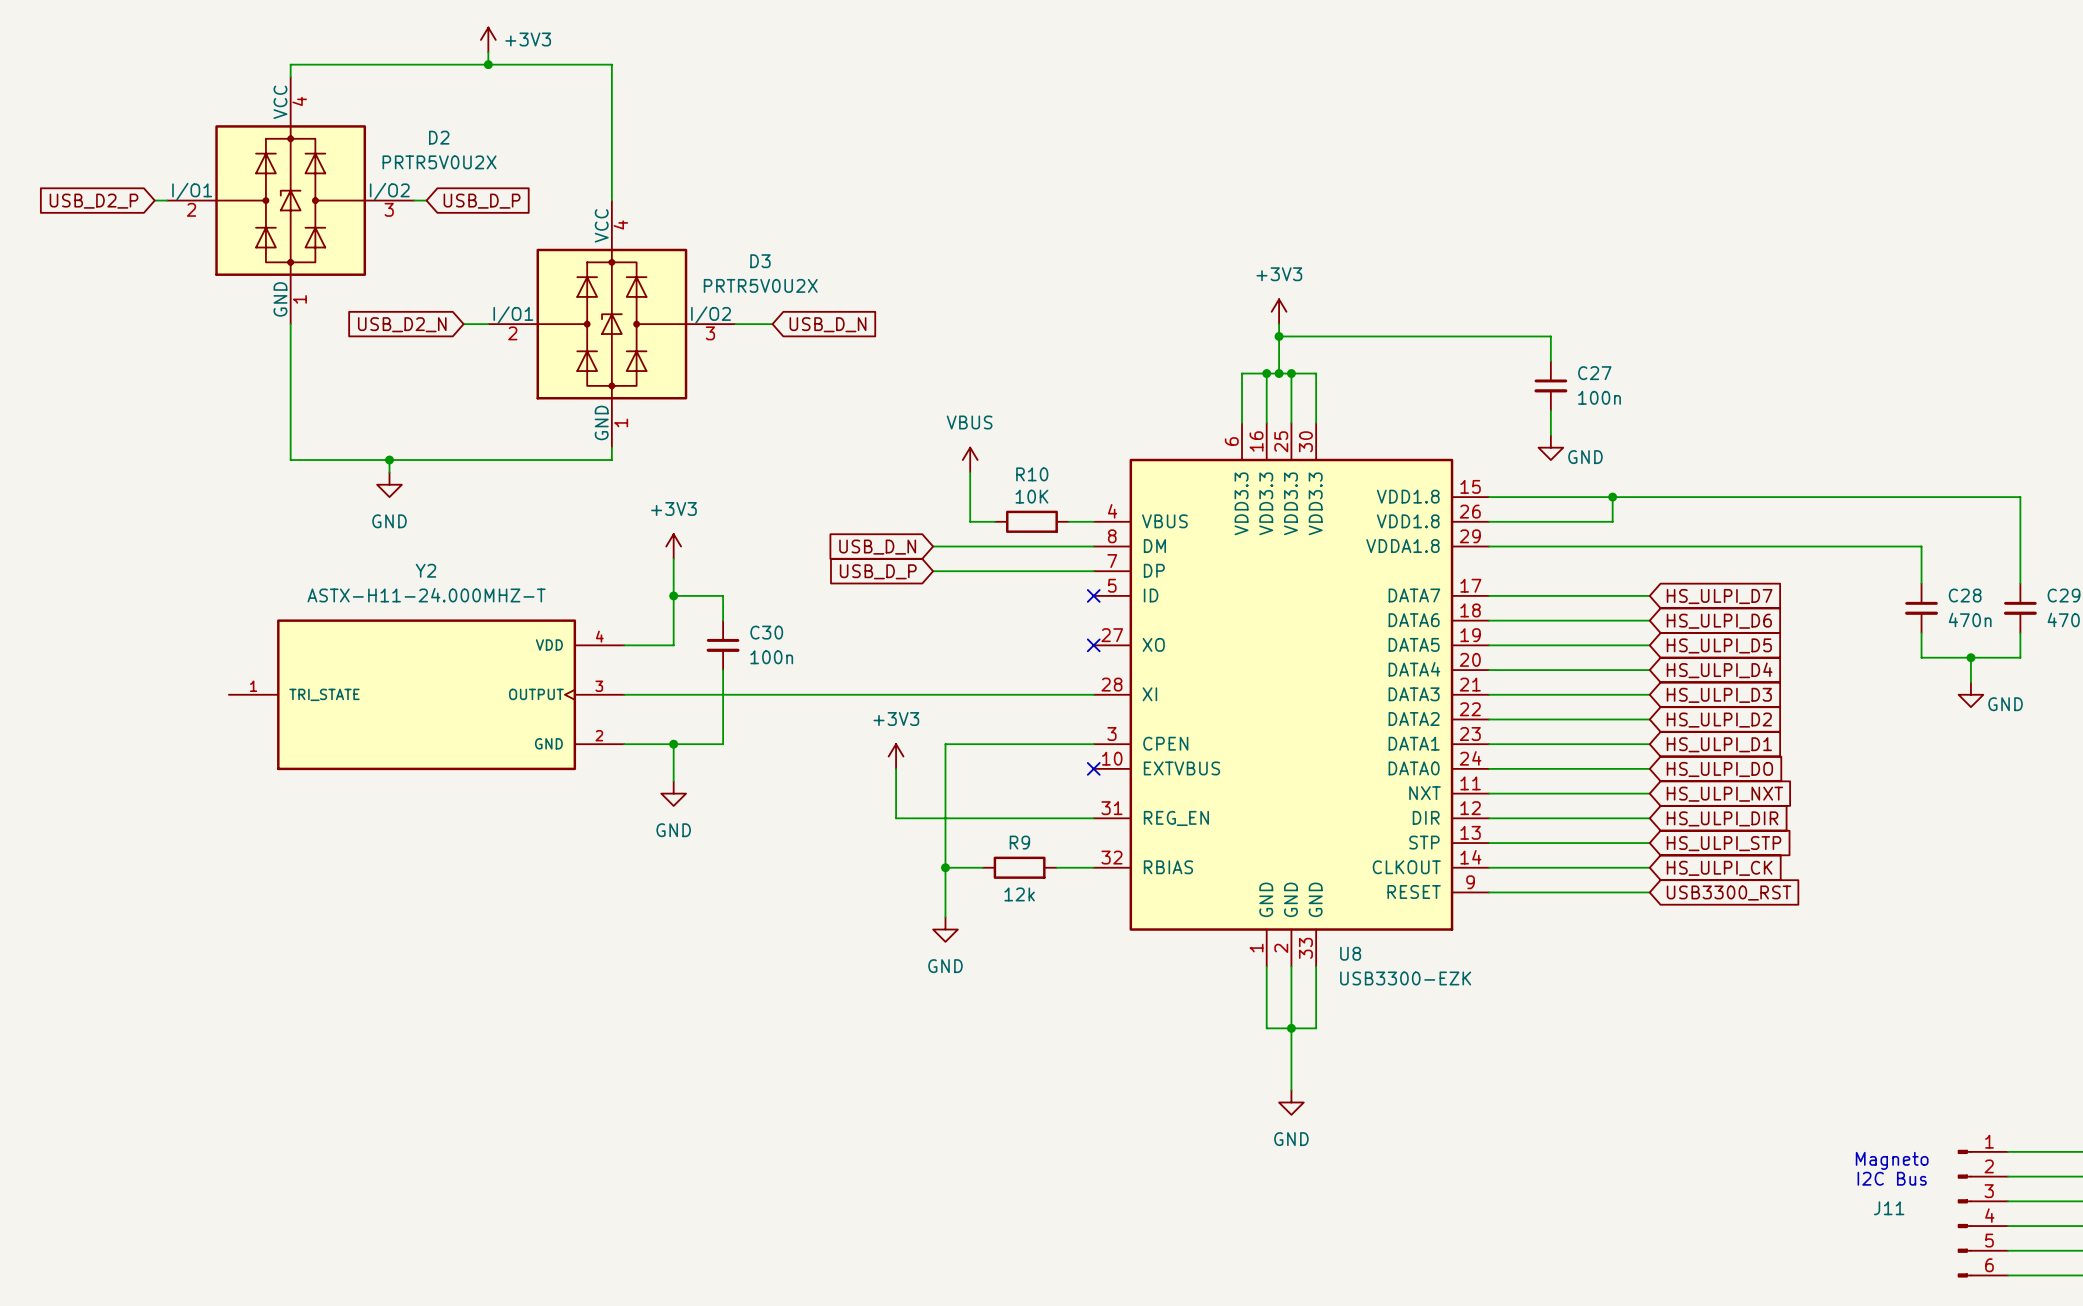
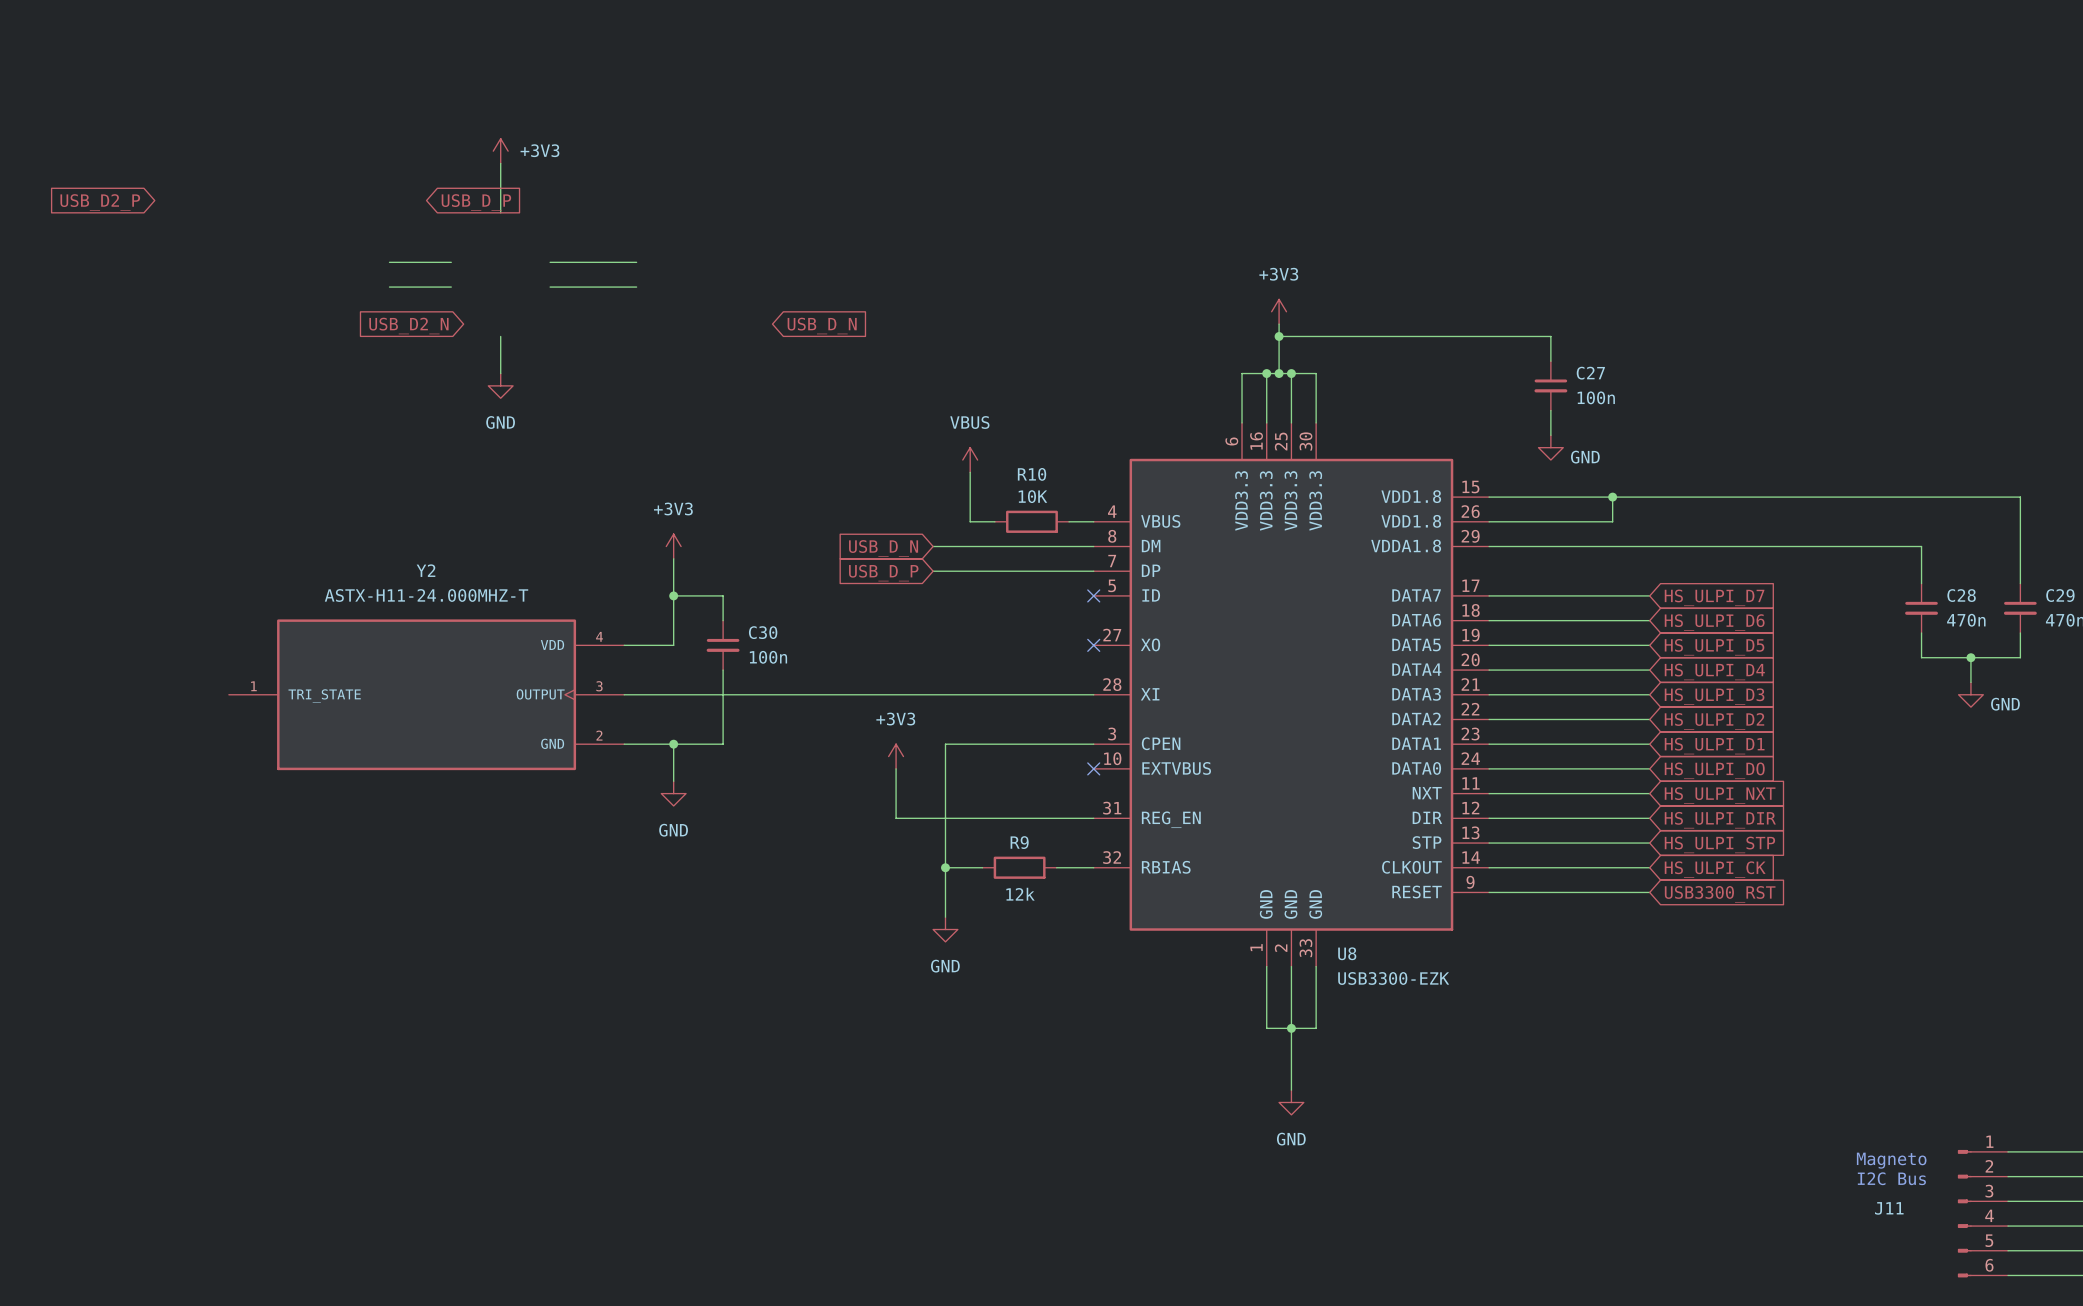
power symbol position: +3V3 (488, 39) -> +3V3 (500, 151)
wire: (488, 52) (488, 64) -> none
junction: (488, 64) -> none
wire: (290, 77) (290, 64) (611, 64) (611, 200) -> none
wire: none -> (500, 163) (500, 212)
wire: (154, 200) (167, 200) -> none
D2: PRTR5V0U2X (290, 200) -> none
wire: (414, 200) (426, 200) -> none
wire: none -> (389, 262) (451, 262)
wire: none -> (389, 287) (451, 287)
wire: (290, 324) (290, 460) (611, 460) (611, 447) -> none
wire: (463, 324) (488, 324) -> none
D3: PRTR5V0U2X (611, 324) -> none
wire: (735, 324) (772, 324) -> none
wire: none -> (500, 336) (500, 373)
wire: (389, 460) (389, 472) -> none
junction: (389, 460) -> none
power symbol position: GND (389, 484) -> GND (500, 385)

